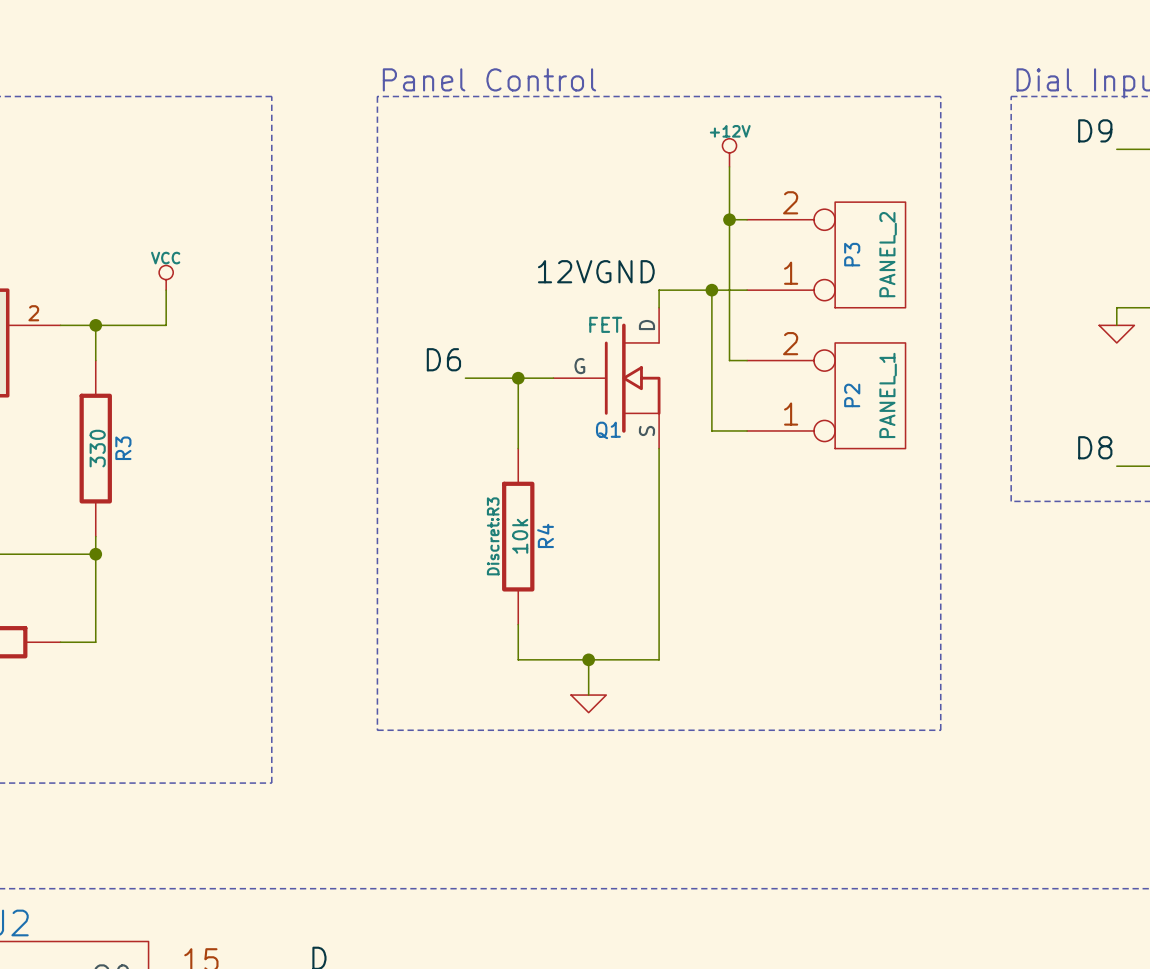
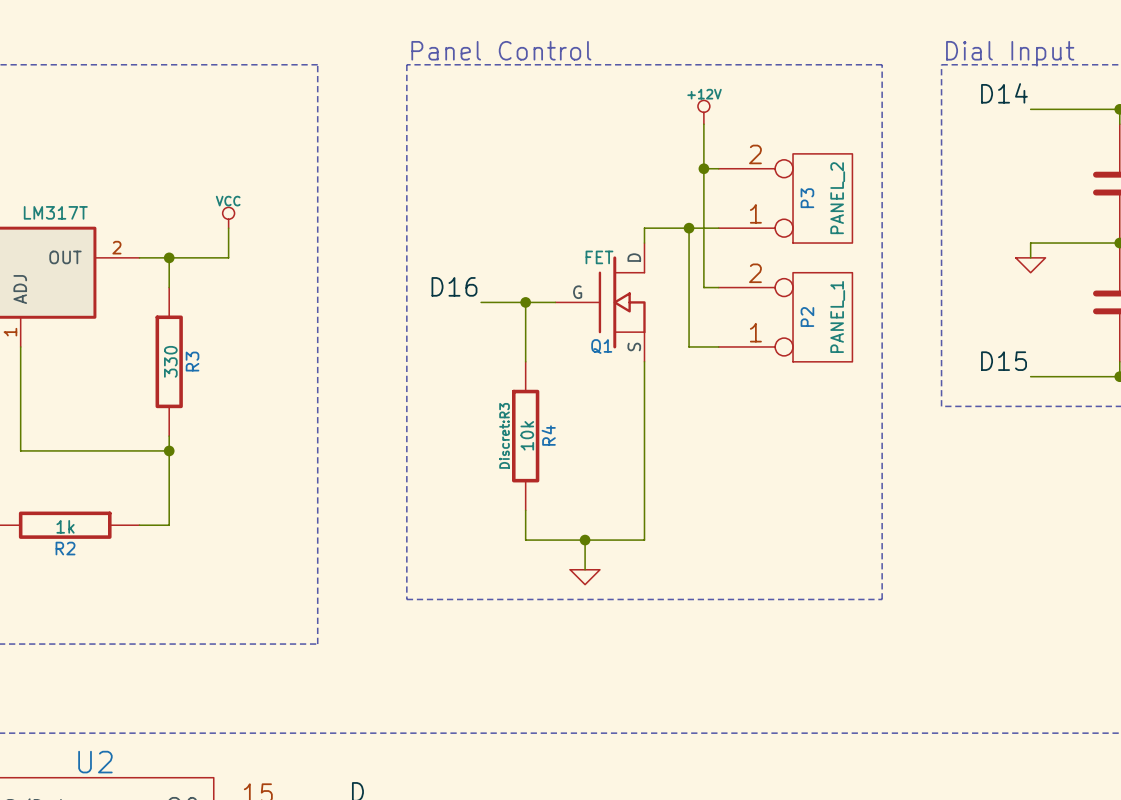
label: D9 (1095, 130) -> D14 (1004, 93)
label: 12VGND (596, 271) -> none
label: D6 (443, 359) -> D16 (454, 286)
label: D8 (1095, 447) -> D15 (1004, 361)

